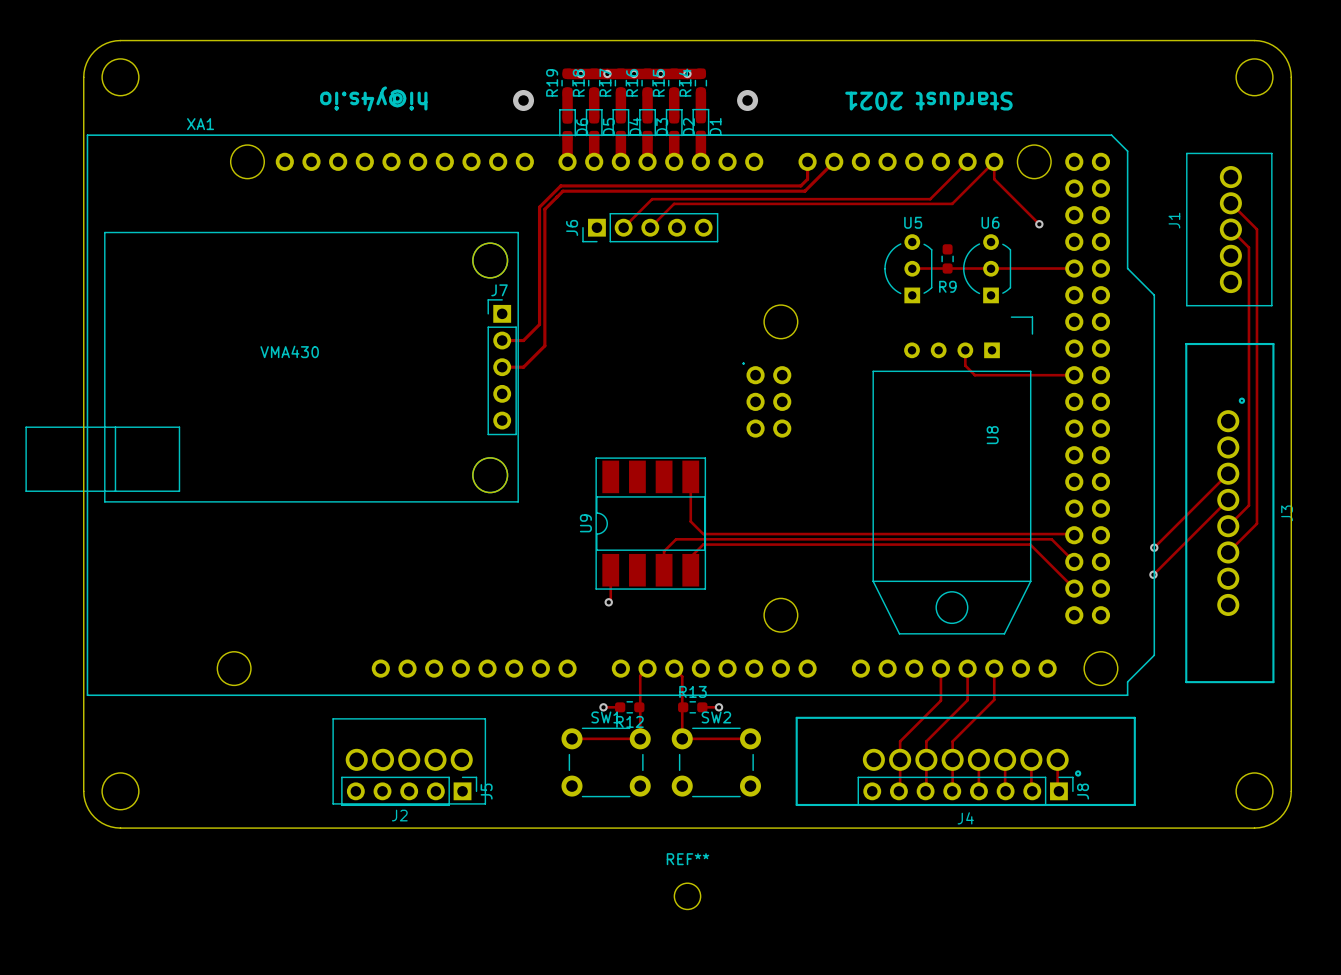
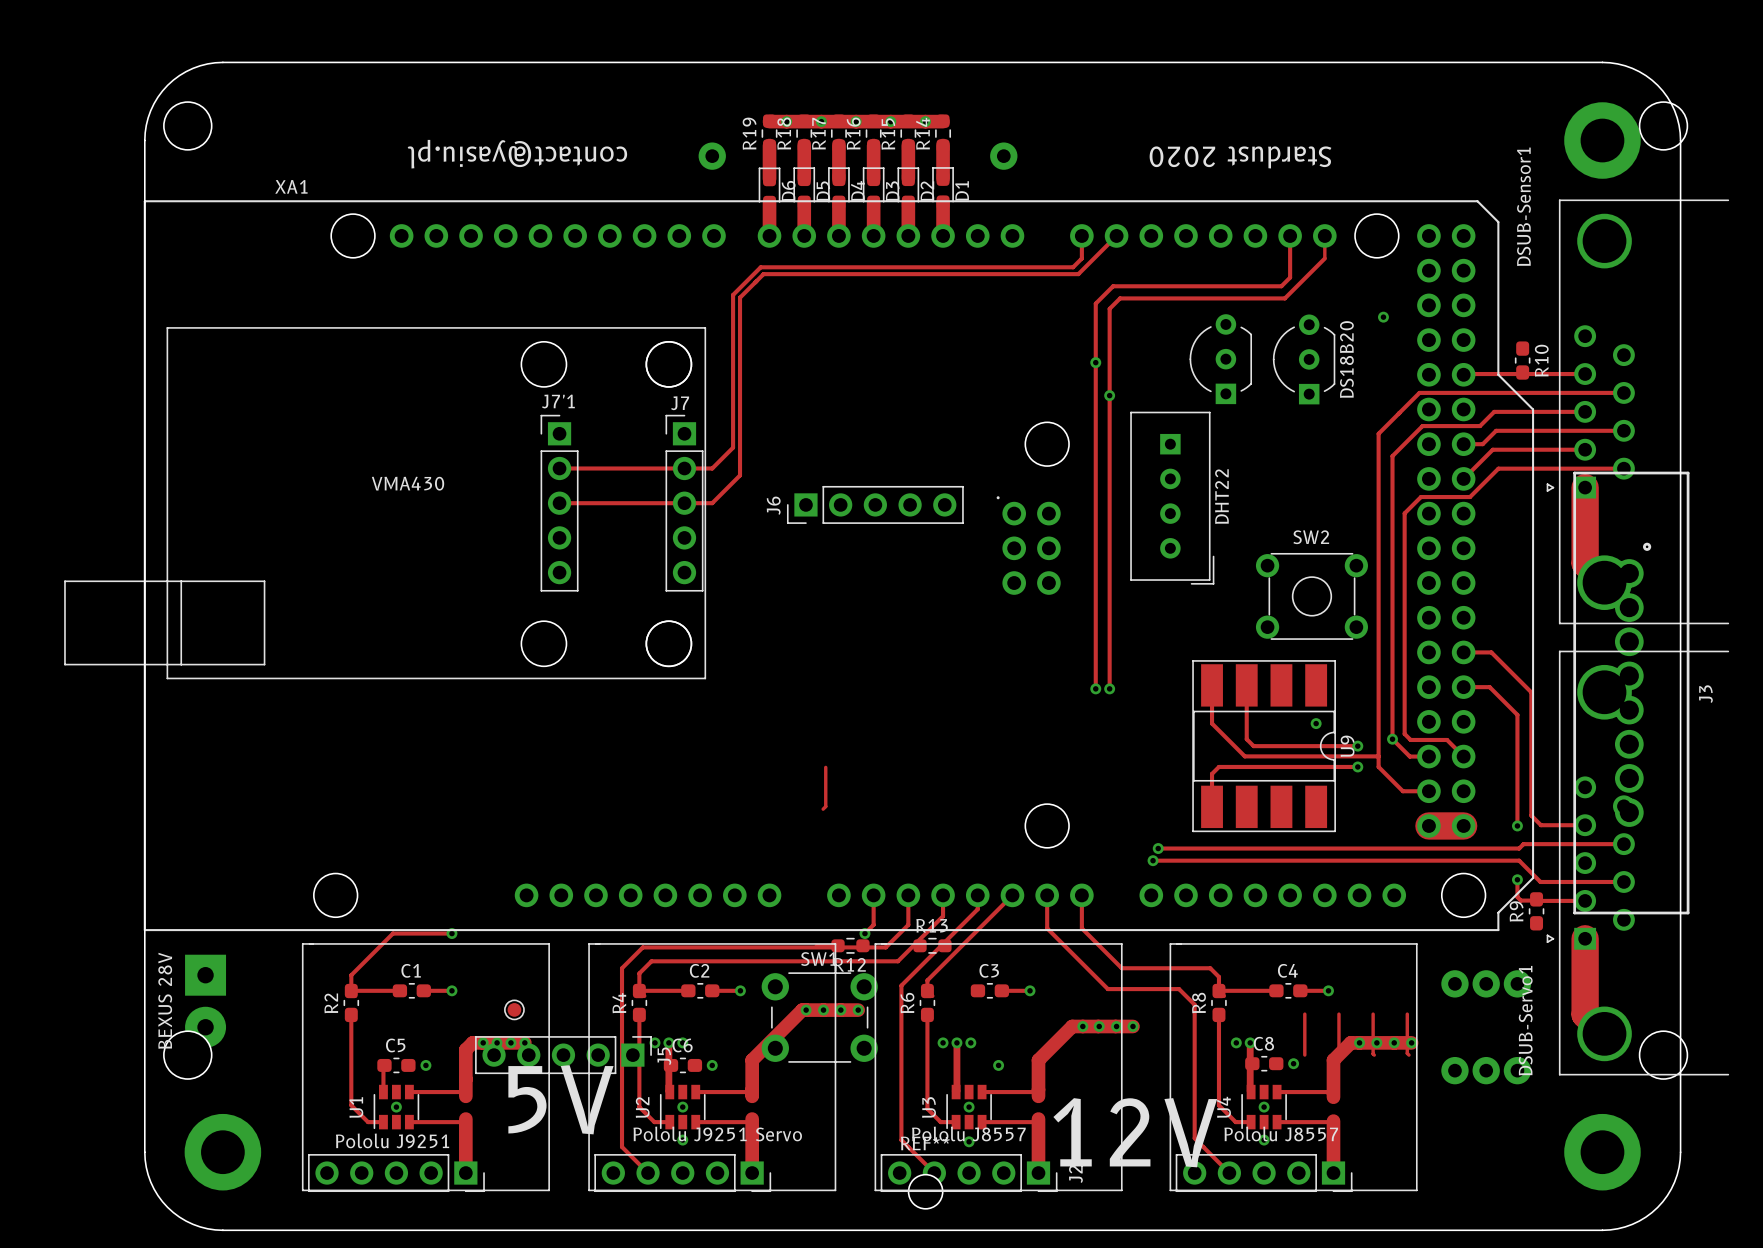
board edge: (120, 40) (1254, 40) (1272, 45) (1286, 58) (1291, 77) (1291, 791) (1286, 809) (1272, 823) (1254, 828) (120, 828) (102, 823) (88, 809) (83, 791) (83, 77) (86, 63) (94, 51) (106, 43) (120, 40) -> (222, 62) (207, 63) (193, 68) (179, 75) (167, 85) (157, 97) (150, 110) (146, 125) (144, 140) (144, 1152) (146, 1167) (154, 1189) (162, 1201) (173, 1212) (193, 1224) (207, 1228) (222, 1230) (1602, 1230) (1617, 1228) (1639, 1221) (1652, 1212) (1662, 1201) (1674, 1182) (1679, 1167) (1680, 1152) (1680, 140) (1679, 125) (1674, 110) (1667, 97) (1652, 80) (1639, 71) (1625, 65) (1602, 62) (222, 62)
part: none -> (1602, 140)
text: hi@y4s.io (373, 98) -> contact@yasiu.pl (517, 154)
text: Stardust 2021 (928, 101) -> Stardust 2020 (1240, 157)
track: (967, 161) (930, 199) (652, 199) (623, 227) -> (1290, 235) (1290, 277) (1281, 286) (1113, 286) (1095, 303) (1095, 688)
track: (994, 161) (952, 203) (674, 203) (650, 227) -> none
track: (994, 179) (1039, 224) -> (1324, 258) (1284, 298) (1120, 298) (1109, 308) (1109, 688)
track: (1230, 203) (1256, 229) (1256, 523) (1228, 552) -> none
J6 position: (650, 227) -> (875, 504)
J1: (1229, 229) -> none
track: (1230, 229) (1248, 247) (1248, 505) (1228, 526) -> none
round board edge: none -> [521, 341, 567, 388]
R9 footprint: [941, 244, 954, 274] -> [1528, 892, 1545, 931]
part: none -> (1220, 359)
part: none -> DS18B20 (1304, 359)
R10: none -> (1522, 360)
via: none -> (1095, 362)
track: none -> (1464, 374) (1585, 374)
U5: (908, 268) -> none
U6: (987, 268) -> none
track: (1074, 268) (912, 268) -> none
via: none -> (1109, 395)
R9 name position: R9 (947, 286) -> R9 (1516, 911)
DSUB-Sensor1: none -> (1637, 411)
track: none -> (1623, 430) (1496, 430) (1482, 444) (1463, 444)
track: none -> (1585, 449) (1492, 449) (1463, 478)
track: none -> (559, 468) (684, 468)
track: none -> (1623, 468) (1498, 468) (1470, 497) (1420, 497) (1404, 513) (1404, 733) (1410, 739) (1447, 739) (1463, 756)
track: (965, 350) (965, 365) (974, 375) (1074, 375) -> none
track: none -> (1585, 487) (1585, 563) (1604, 582)
part: none -> DHT22 (1172, 498)
track: none -> (559, 503) (684, 503)
J7'1: none -> (559, 503)
round board edge: none -> [521, 620, 567, 667]
track: (1228, 473) (1154, 547) -> none
U8: (952, 475) -> none
track: (690, 476) (690, 521) (703, 534) (1074, 535) -> none
track: none -> (1463, 652) (1491, 652) (1531, 692) (1531, 815) (1540, 825) (1585, 825)
track: (1228, 499) (1152, 576) -> none
track: none -> (1212, 685) (1212, 723) (1244, 756) (1378, 756)
track: none -> (1246, 685) (1246, 739) (1253, 746) (1357, 746)
track: none -> (1463, 687) (1489, 687) (1517, 714) (1517, 825)
via: none -> (1095, 688)
via: none -> (1109, 688)
U9 rotation: 0° (650, 523) -> 180° (1264, 746)
U9 position: (650, 523) -> (1264, 746)
via: none -> (1316, 723)
via: (1154, 547) -> none
via: none -> (1392, 739)
via: none -> (1357, 746)
track: (1074, 561) (1051, 539) (676, 539) (664, 551) (664, 570) -> (1428, 756) (1409, 756) (1392, 739) (1392, 456) (1422, 426) (1480, 426) (1494, 411) (1585, 411)
track: none -> (1357, 766) (1218, 766) (1212, 773) (1212, 806)
via: none -> (1357, 766)
track: (690, 570) (690, 557) (703, 544) (1030, 544) (1074, 588) -> (1623, 392) (1419, 392) (1378, 433) (1378, 766) (1402, 791) (1428, 791)
via: (1153, 574) -> none
via: (608, 602) -> none
track: none -> (1428, 825) (1463, 825)
via: none -> (1517, 825)
track: none -> (1623, 844) (1523, 844) (1519, 848) (1158, 848)
via: none -> (1158, 848)
track: none -> (1153, 860) (1519, 860) (1540, 881) (1623, 881)
via: none -> (1153, 860)
DSUB-Servo1: none -> (1637, 863)
track: none -> (1517, 879) (1517, 897) (1520, 900) (1585, 900)
via: none -> (1517, 879)
track: (647, 668) (640, 675) (640, 738) (572, 738) -> (873, 895) (873, 924) (864, 933)
track: (674, 668) (682, 676) (682, 738) (750, 738) -> (908, 895) (908, 924) (885, 947) (642, 947) (622, 968) (622, 1147) (648, 1173)
track: none -> (943, 895) (943, 916) (897, 961) (651, 961) (639, 973) (639, 991) (644, 996)
track: none -> (977, 895) (977, 909) (901, 985) (901, 1140) (934, 1173)
track: none -> (1012, 895) (927, 980) (927, 991) (932, 996)
track: none -> (1047, 895) (1047, 928) (1107, 989) (1179, 989) (1194, 1004) (1194, 1138) (1229, 1173)
track: none -> (1081, 895) (1081, 928) (1121, 968) (1210, 968) (1218, 976) (1218, 991) (1223, 996)
track: (940, 668) (940, 700) (900, 741) (898, 791) -> none
track: (994, 668) (994, 699) (952, 741) (952, 791) -> none
track: (966, 669) (967, 668) (967, 700) (926, 741) (925, 791) -> none
track: none -> (451, 933) (392, 933) (351, 975) (351, 992) (355, 996)
via: none -> (451, 933)
via: none -> (864, 933)
track: none -> (1585, 938) (1585, 1014) (1604, 1033)
via: (603, 707) -> none
track: (702, 707) (719, 707) -> none
via: (719, 707) -> none
J2 footprint: [332, 718, 487, 805] -> [874, 943, 1123, 1193]
SW2 footprint: [671, 727, 762, 798] -> [1255, 552, 1368, 640]
via: none -> (1454, 983)
via: none -> (1486, 983)
via: none -> (1517, 983)
track: none -> (355, 990) (399, 990)
C1: none -> (411, 990)
track: none -> (423, 990) (451, 990)
via: none -> (451, 990)
track: none -> (644, 990) (688, 990)
C2: none -> (700, 990)
track: none -> (712, 990) (740, 990)
via: none -> (740, 990)
C3: none -> (989, 990)
track: none -> (1001, 990) (1030, 990)
via: none -> (1030, 990)
track: none -> (1223, 990) (1276, 990)
C4: none -> (1288, 990)
track: none -> (1300, 990) (1328, 990)
via: none -> (1328, 990)
part: none -> BEXUS 28V (205, 1001)
R2: none -> (351, 1002)
R4: none -> (639, 1002)
R6: none -> (927, 1002)
R8: none -> (1218, 1002)
part: none -> (514, 1009)
via: none -> (806, 1010)
via: none -> (823, 1010)
via: none -> (840, 1010)
track: none -> (858, 1010) (802, 1010) (752, 1060) (752, 1096) (747, 1092) (695, 1092)
via: none -> (858, 1010)
track: none -> (351, 1013) (351, 1105) (368, 1122) (383, 1122)
track: none -> (639, 1014) (639, 1107) (654, 1122) (669, 1122)
track: none -> (927, 1014) (927, 1108) (940, 1122) (956, 1122)
track: none -> (1218, 1014) (1218, 1105) (1235, 1122) (1251, 1122)
J4: (965, 761) -> none
via: none -> (1082, 1026)
via: none -> (1099, 1026)
via: none -> (1116, 1026)
track: none -> (1132, 1026) (1072, 1026) (1038, 1060) (1038, 1096) (1034, 1092) (982, 1092)
via: none -> (1132, 1026)
via: none -> (483, 1042)
via: none -> (497, 1042)
via: none -> (510, 1042)
track: none -> (524, 1042) (472, 1042) (465, 1049) (465, 1096)
via: none -> (524, 1042)
via: none -> (654, 1042)
track: none -> (668, 1042) (669, 1092)
via: none -> (668, 1042)
via: none -> (682, 1042)
via: none -> (943, 1042)
track: none -> (956, 1042) (956, 1091) (955, 1091)
via: none -> (956, 1042)
via: none -> (970, 1042)
via: none -> (1236, 1042)
track: none -> (1250, 1042) (1251, 1092)
via: none -> (1250, 1042)
via: none -> (1359, 1042)
via: none -> (1376, 1042)
via: none -> (1394, 1042)
track: none -> (1411, 1042) (1350, 1042) (1333, 1060) (1333, 1097)
via: none -> (1411, 1042)
J8: (965, 791) -> none
C8: none -> (1264, 1063)
via: none -> (1293, 1063)
track: none -> (384, 1065) (383, 1092)
C5: none -> (396, 1065)
via: none -> (425, 1065)
C6: none -> (682, 1065)
via: none -> (712, 1065)
via: none -> (998, 1065)
part: none -> Pololu J9251 (425, 1067)
part: none -> Pololu J9251 Servo (712, 1067)
part: none -> Pololu J8557 (1293, 1067)
via: none -> (1454, 1070)
via: none -> (1486, 1070)
via: none -> (1517, 1070)
J2 name position: J2 (399, 815) -> J2 (1075, 1174)
track: none -> (409, 1092) (461, 1092) (465, 1096)
track: none -> (1277, 1092) (1327, 1092) (1333, 1098)
text: none -> 5V (560, 1099)
U1: none -> (396, 1107)
via: none -> (396, 1107)
U2: none -> (682, 1107)
via: none -> (682, 1107)
U3: none -> (969, 1107)
via: none -> (969, 1107)
U4: none -> (1264, 1107)
via: none -> (1264, 1107)
track: none -> (465, 1117) (461, 1122) (409, 1122)
track: none -> (752, 1117) (747, 1122) (695, 1122)
track: none -> (1038, 1117) (1034, 1122) (982, 1122)
track: none -> (465, 1119) (465, 1173)
track: none -> (752, 1119) (752, 1173)
track: none -> (1038, 1119) (1038, 1173)
track: none -> (1333, 1119) (1331, 1122) (1277, 1122)
track: none -> (1333, 1121) (1333, 1173)
text: none -> 12V (1135, 1132)
via: none -> (682, 1140)
via: none -> (1264, 1140)
via: none -> (969, 1141)
part: none -> (222, 1152)
part: none -> (1602, 1152)

